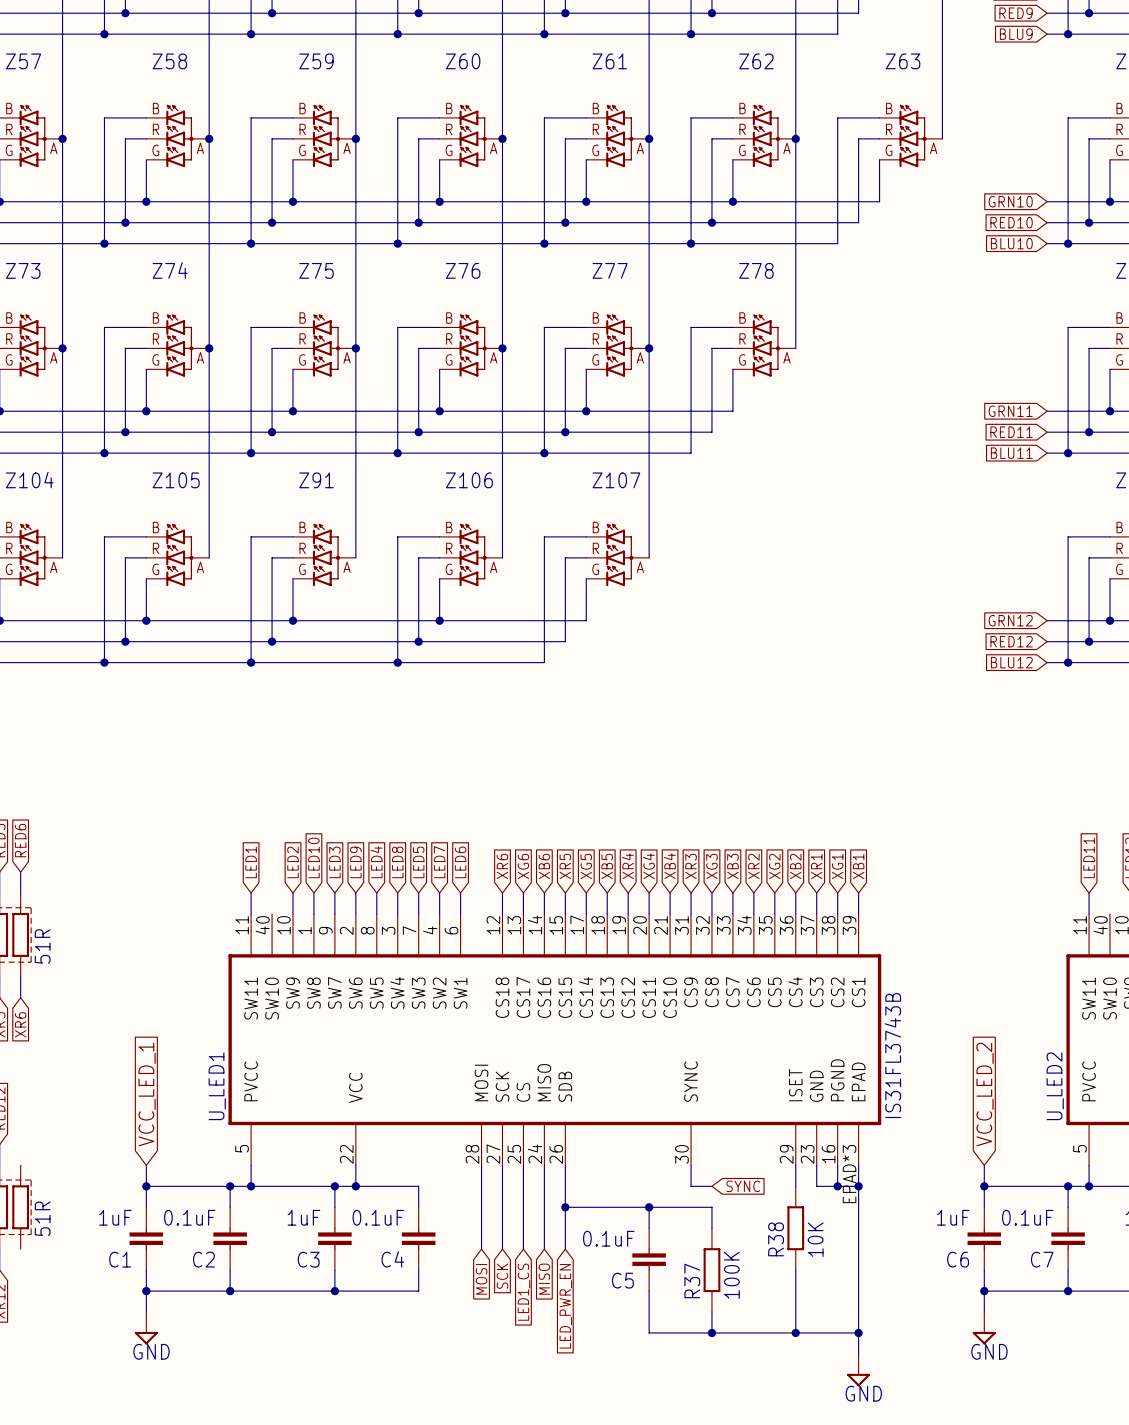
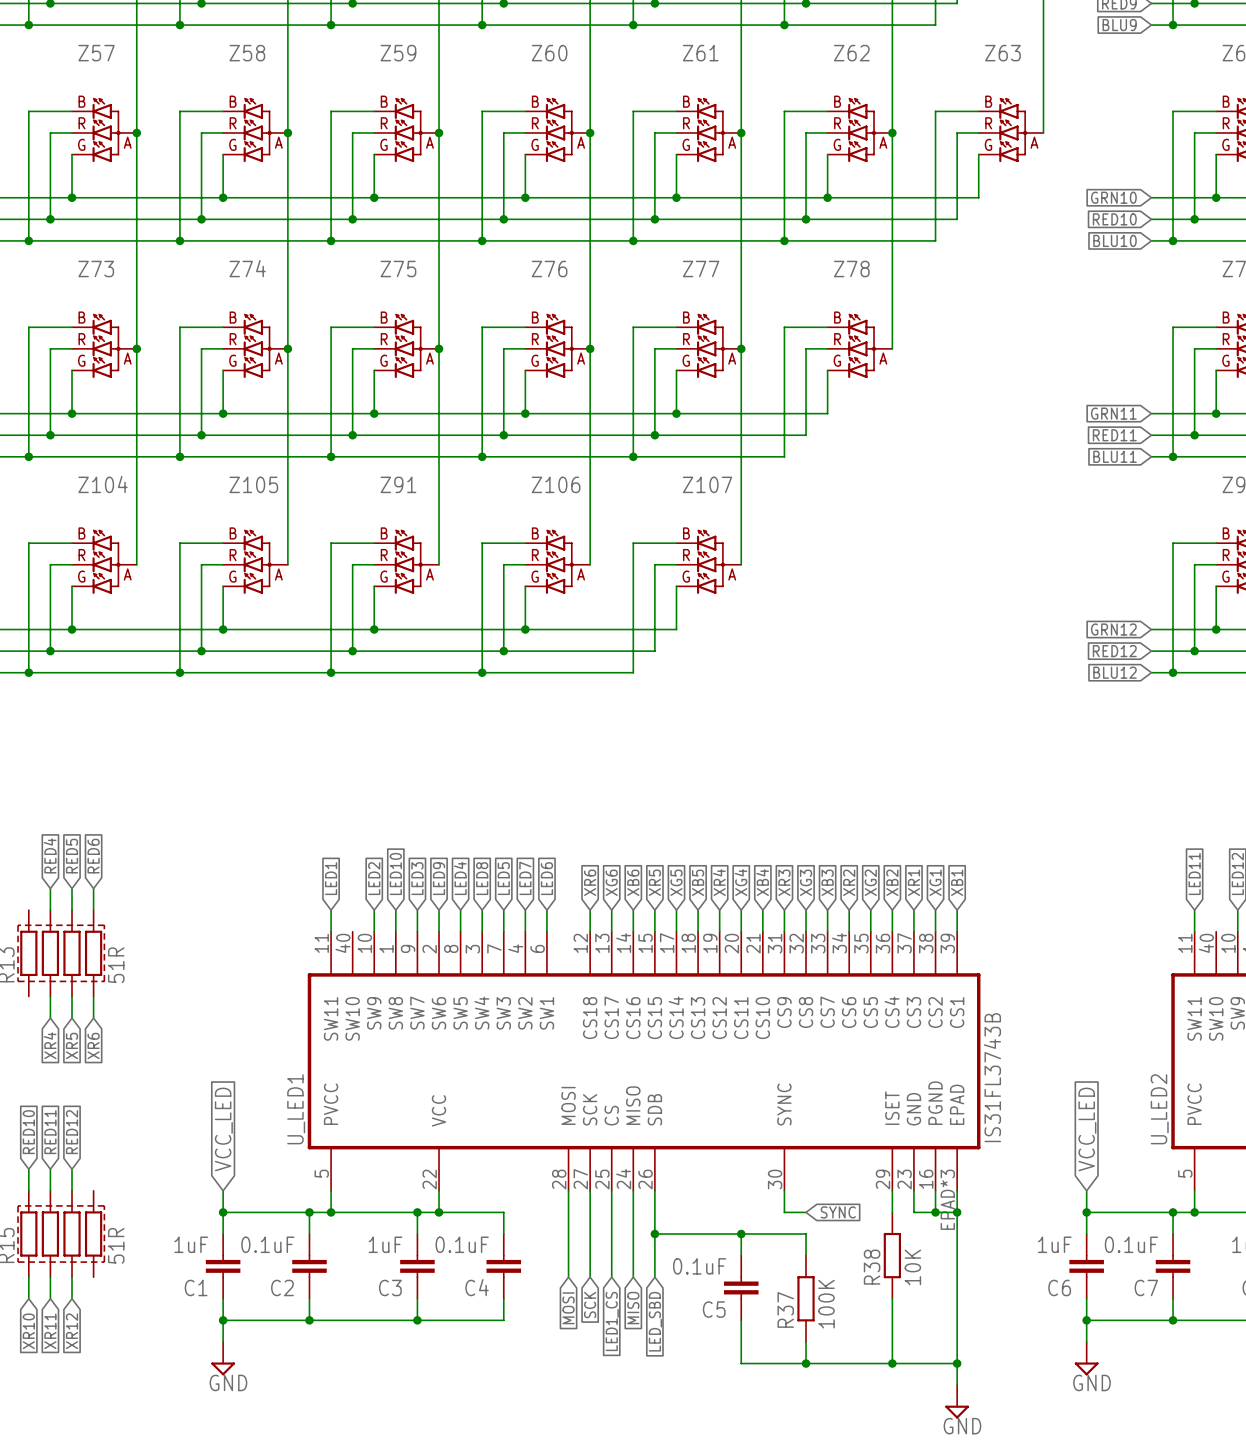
global label: VCC_LED_1 (147, 1094) -> VCC_LED (223, 1129)
global label: VCC_LED_2 (985, 1094) -> VCC_LED (1087, 1129)
global label: LED_PWR_EN (565, 1306) -> LED_SBD (655, 1321)

